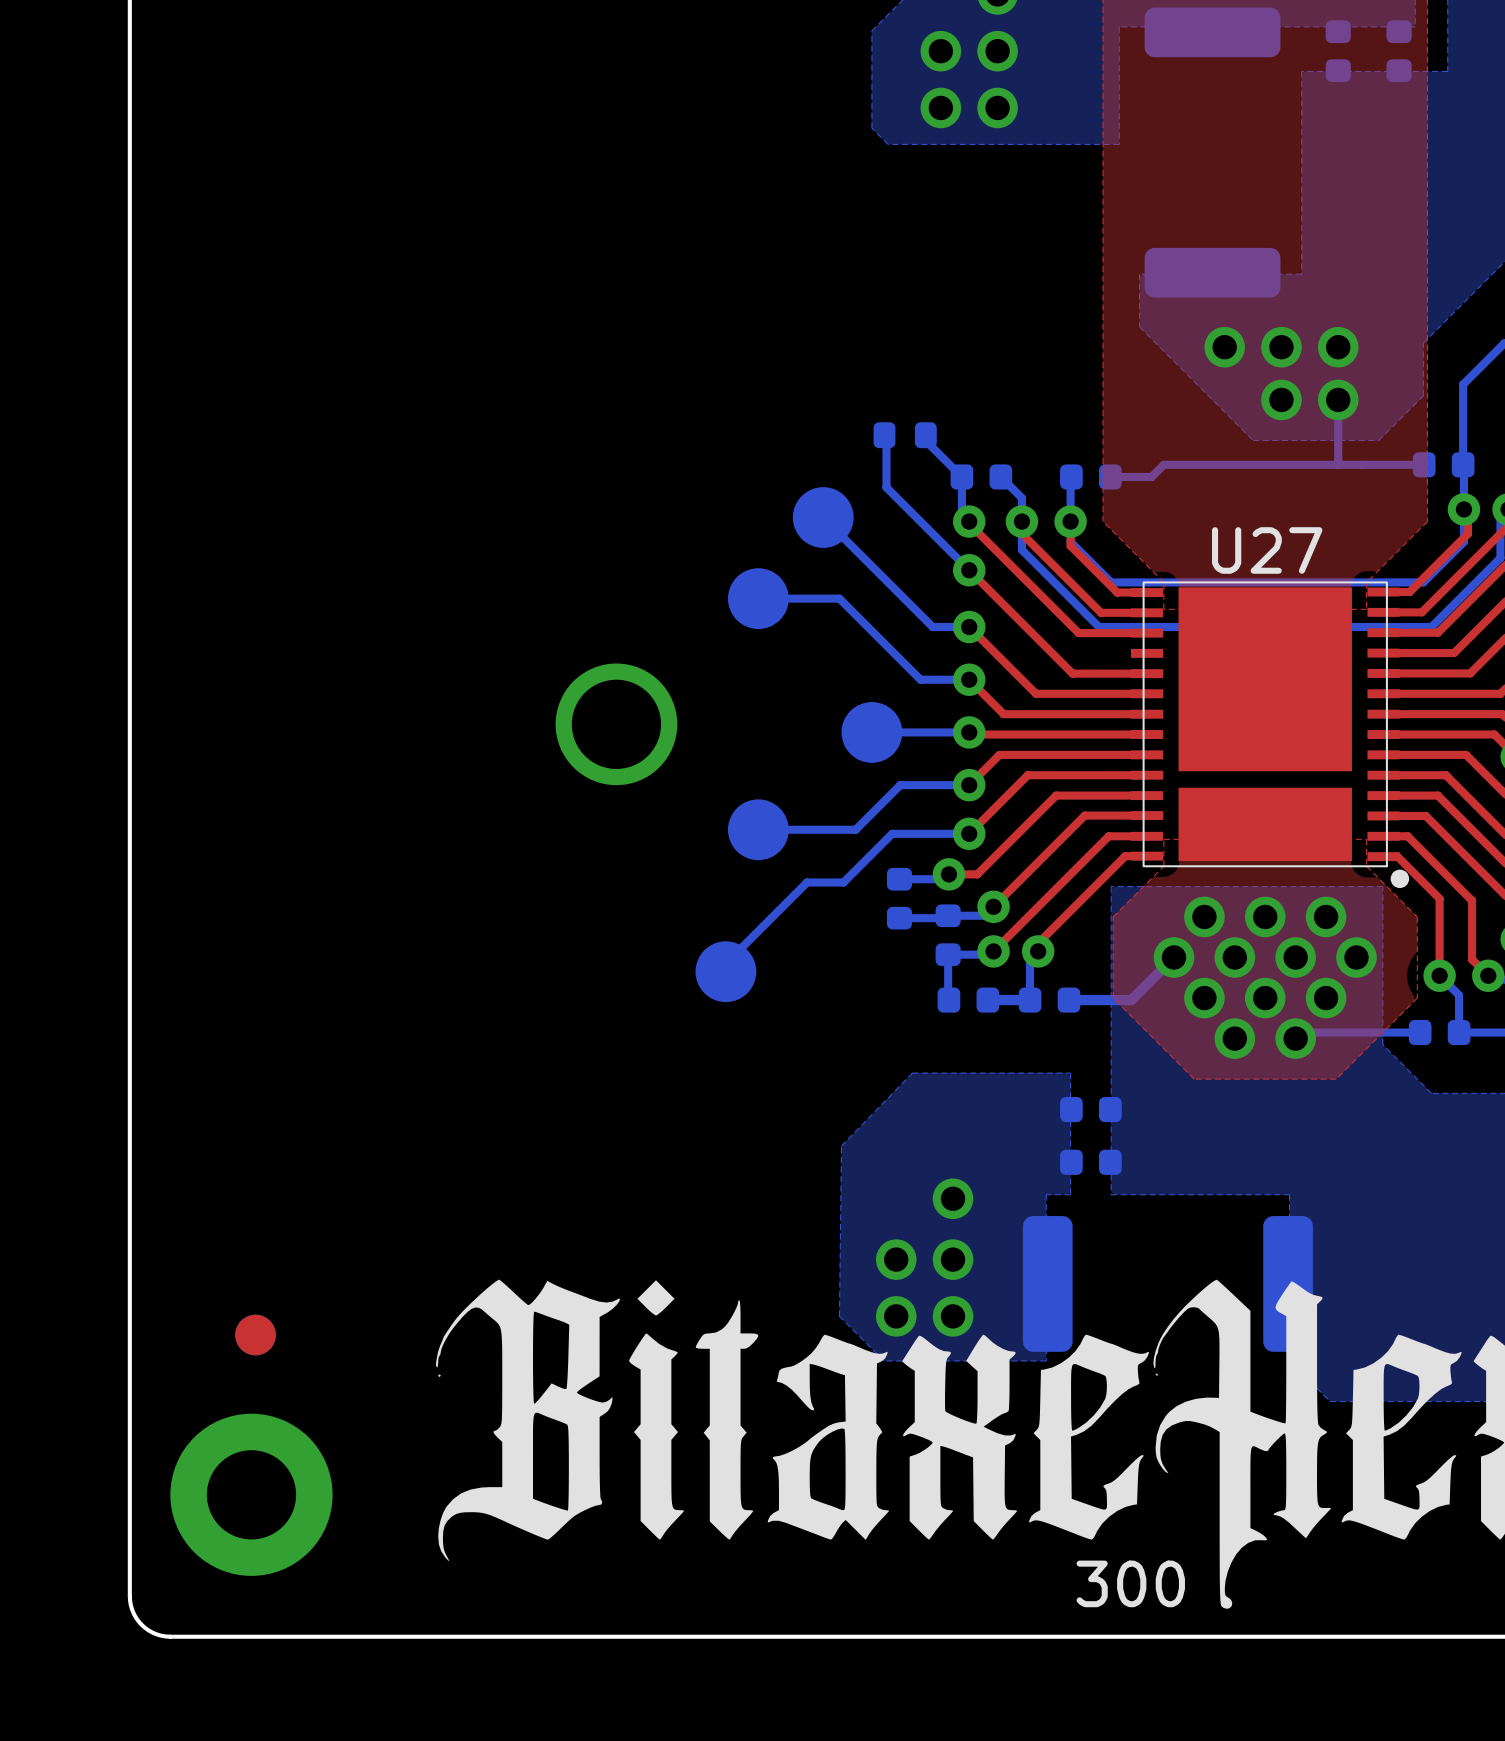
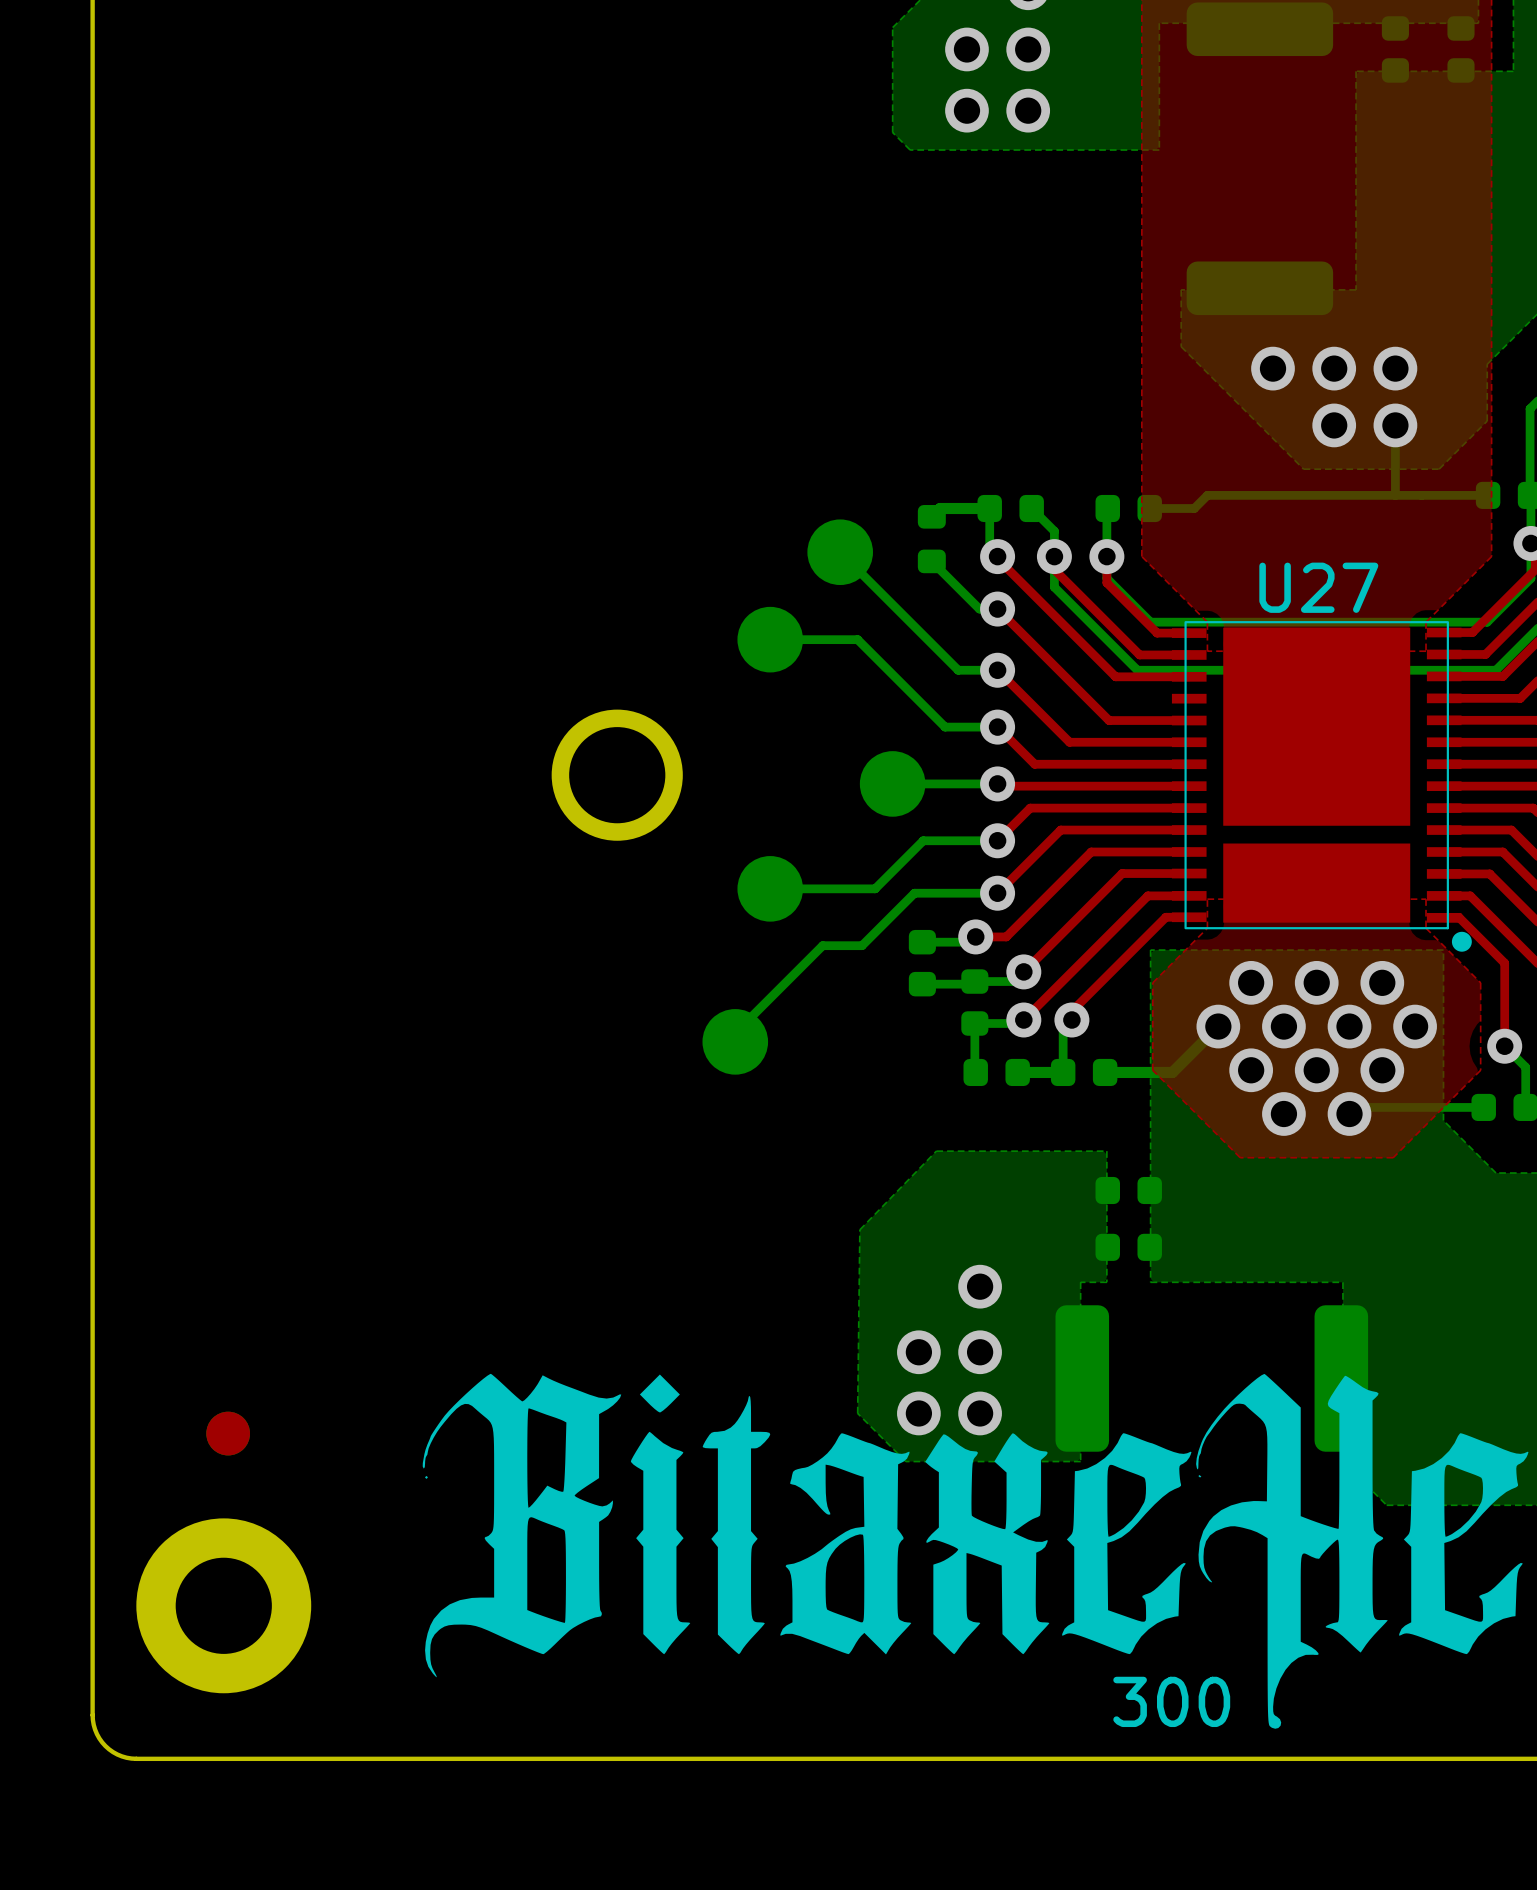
part rotation: 0° (905, 435) -> 90° clockwise (931, 539)
part position: (905, 435) -> (931, 539)
bottom track: (925, 435) (925, 440) (961, 476) -> (931, 516) (940, 508) (989, 508)
bottom track: (886, 438) (886, 487) (969, 570) -> (931, 561) (979, 609) (997, 609)

